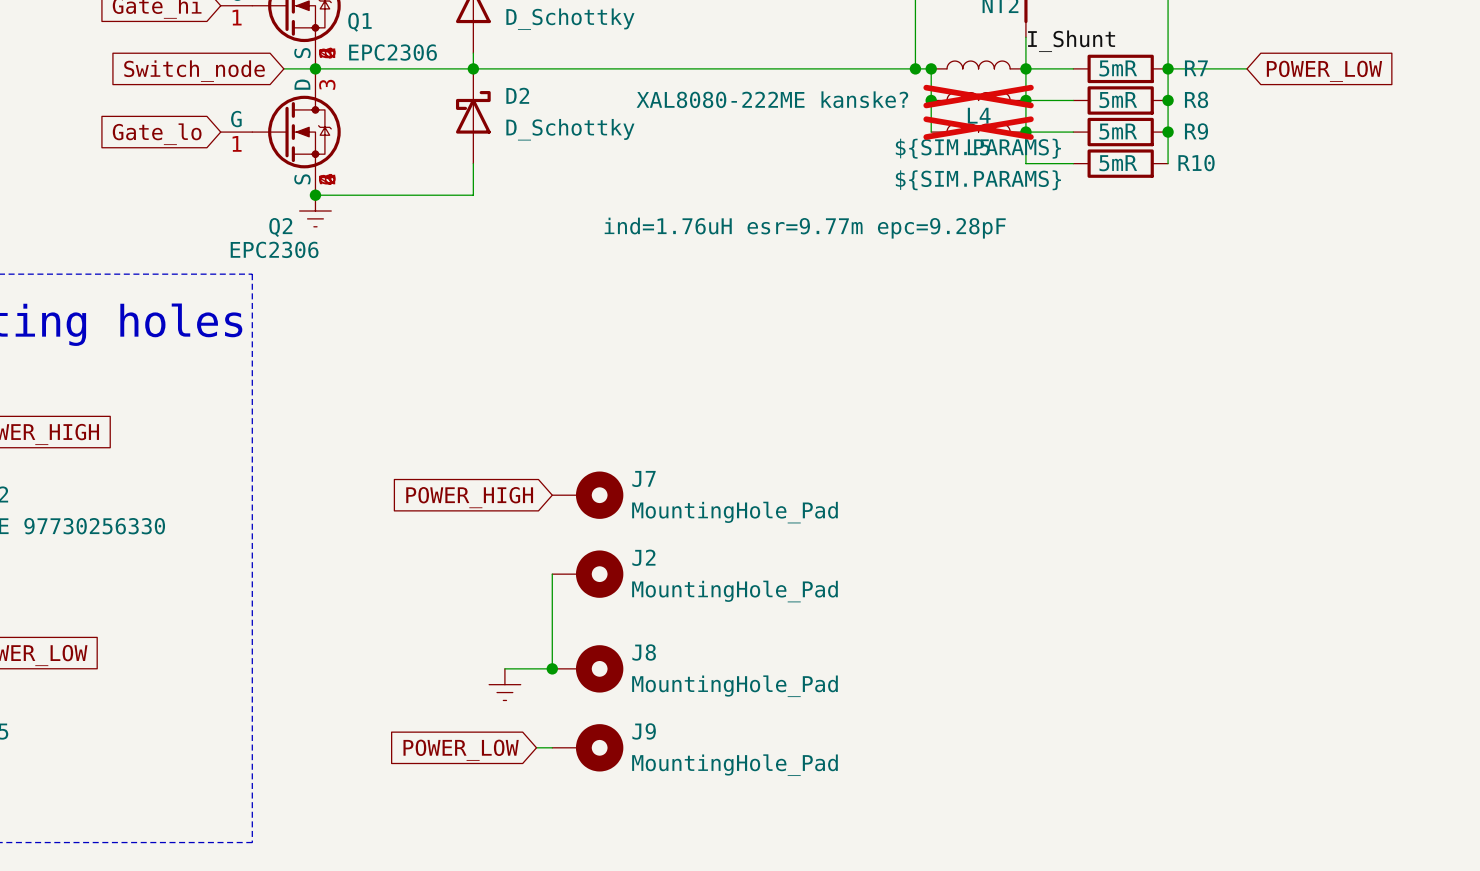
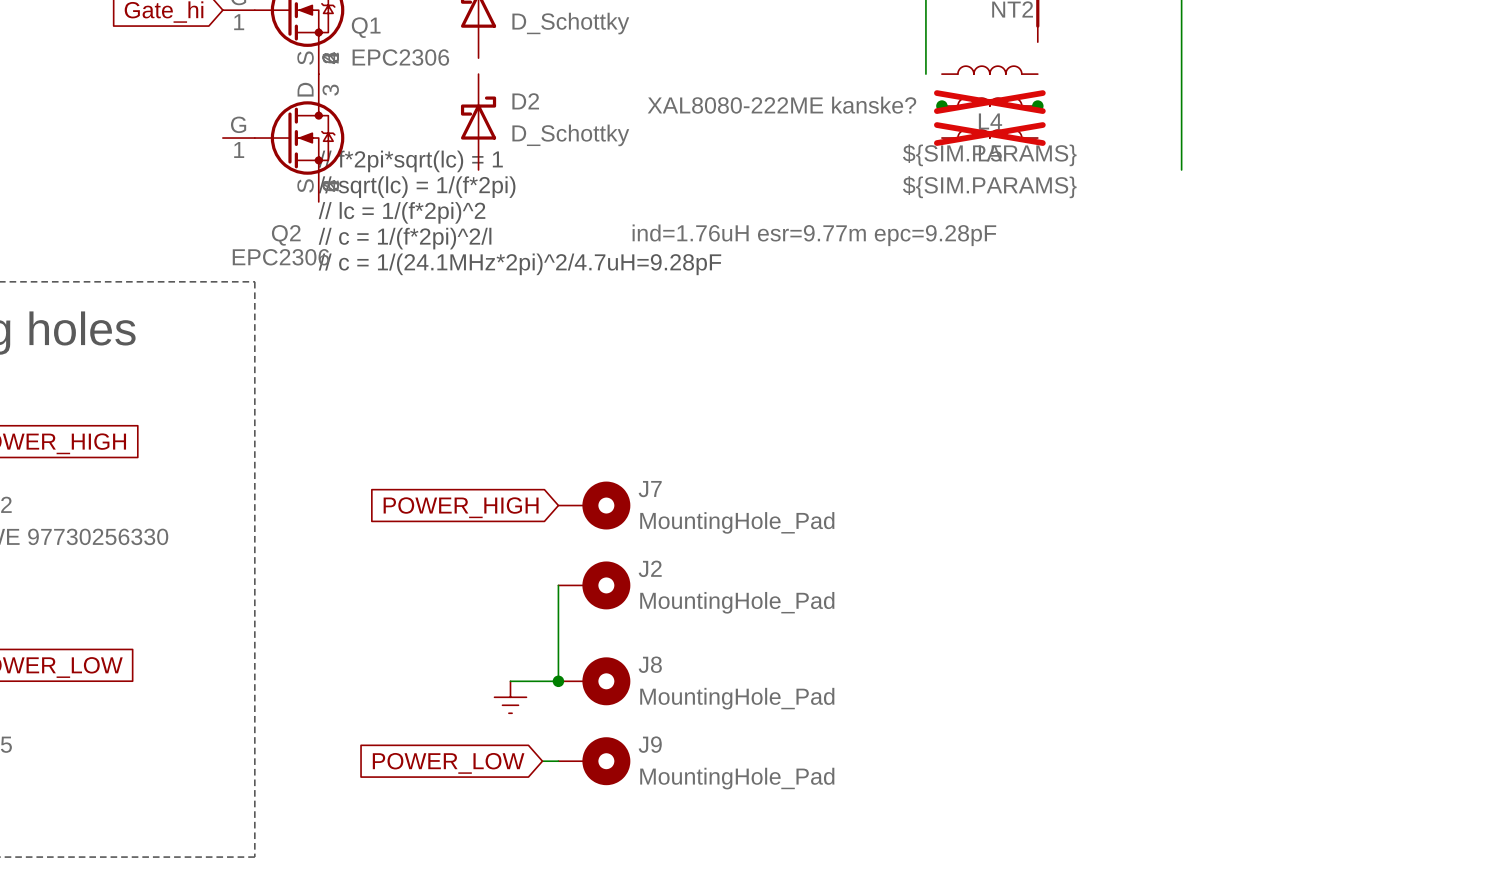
wire: (1025, 37) (1025, 163) (1073, 163) -> none
label: I_Shunt (1071, 41) -> none
wire: (473, 53) (473, 68) -> none
wire: (283, 68) (931, 68) (931, 132) -> none
junction: (315, 68) -> none
junction: (473, 68) -> none
junction: (915, 68) -> none
junction: (931, 68) -> none
wire: (1025, 68) (1073, 68) -> none
junction: (1025, 68) -> none
R7: 5mR (1120, 68) -> none
wire: (1168, 68) (1246, 68) -> none
junction: (1168, 68) -> none
global label: Switch_node (194, 71) -> none
global label: POWER_LOW (1324, 71) -> none
wire: (1025, 100) (1073, 100) -> none
R8: 5mR (1120, 100) -> none
junction: (1168, 100) -> none
wire: (1025, 132) (1073, 132) -> none
junction: (1025, 132) -> none
R9: 5mR (1120, 132) -> none
junction: (1168, 132) -> none
global label: Gate_lo (157, 134) -> none
text: none -> // f*2pi*sqrt(lc) = 1 (410, 161)
wire: (473, 163) (473, 195) (315, 195) -> none
R10: 5mR (1120, 163) -> none
text: none -> // sqrt(lc) = 1/(f*2pi) (417, 187)
junction: (315, 195) -> none
text: none -> // lc = 1/(f*2pi)^2 (402, 212)
power symbol: (315, 211) -> none
text: none -> // c = 1/(f*2pi)^2/l (405, 238)
text: none -> // c = 1/(24.1MHz*2pi)^2/4.7uH=9.28pF (519, 264)

